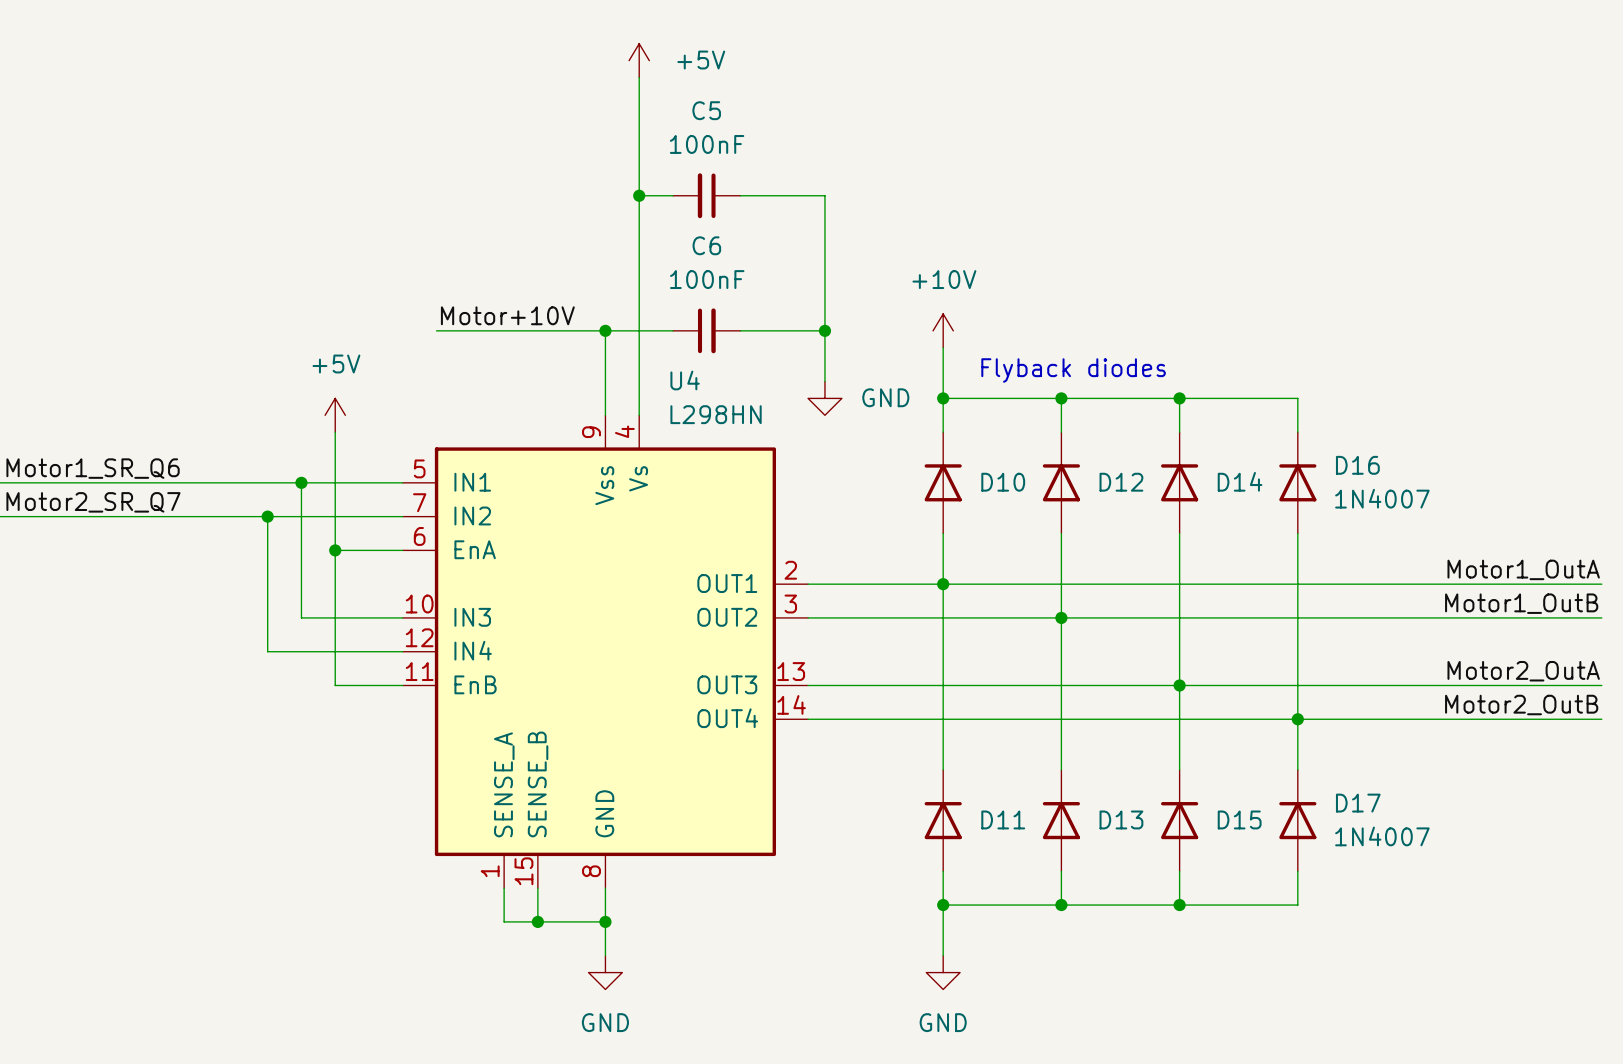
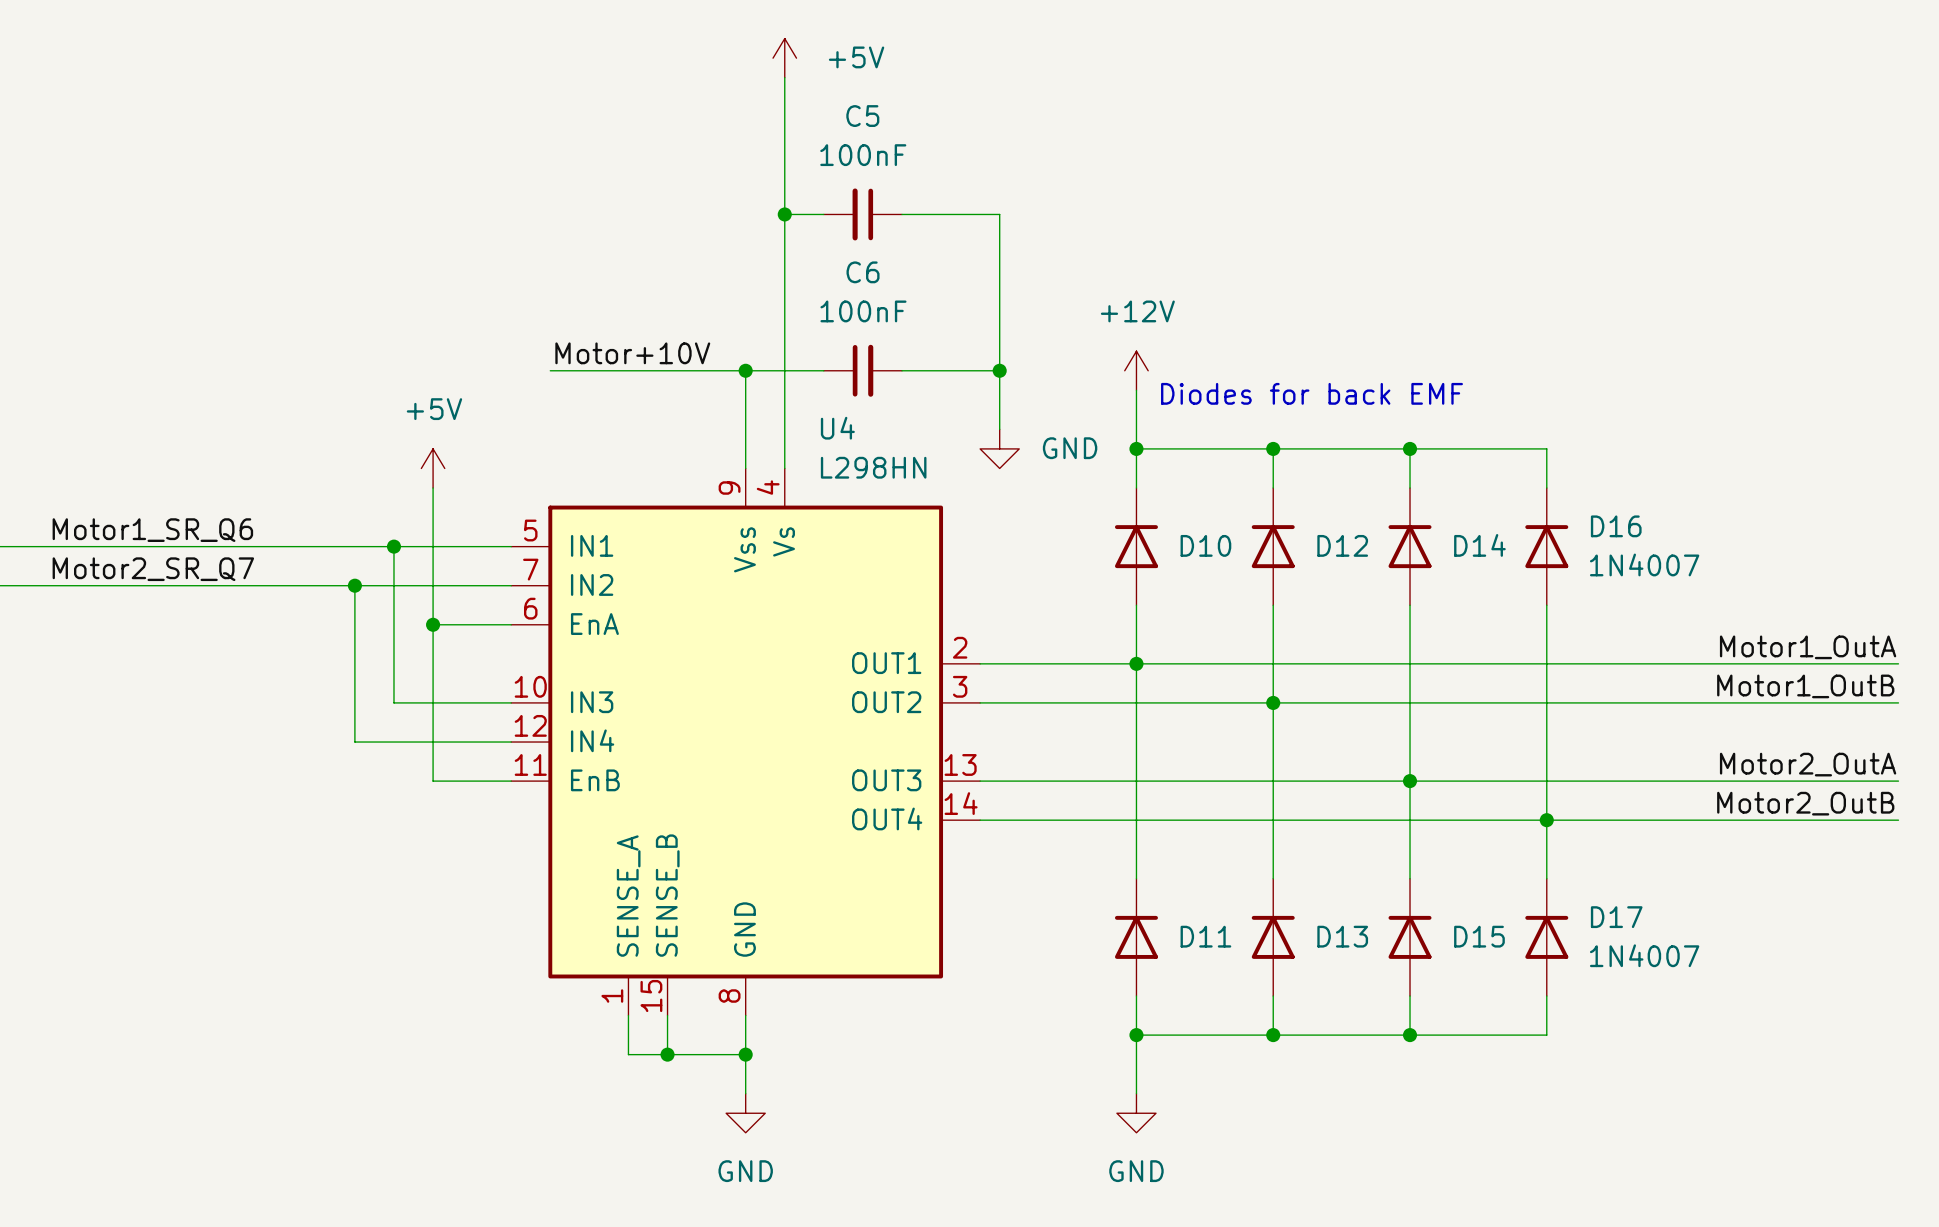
power symbol: +10V (943, 330) -> +12V (1136, 370)
text: none -> Diodes for back EMF (1311, 393)
text: Flyback diodes (1073, 370) -> none

